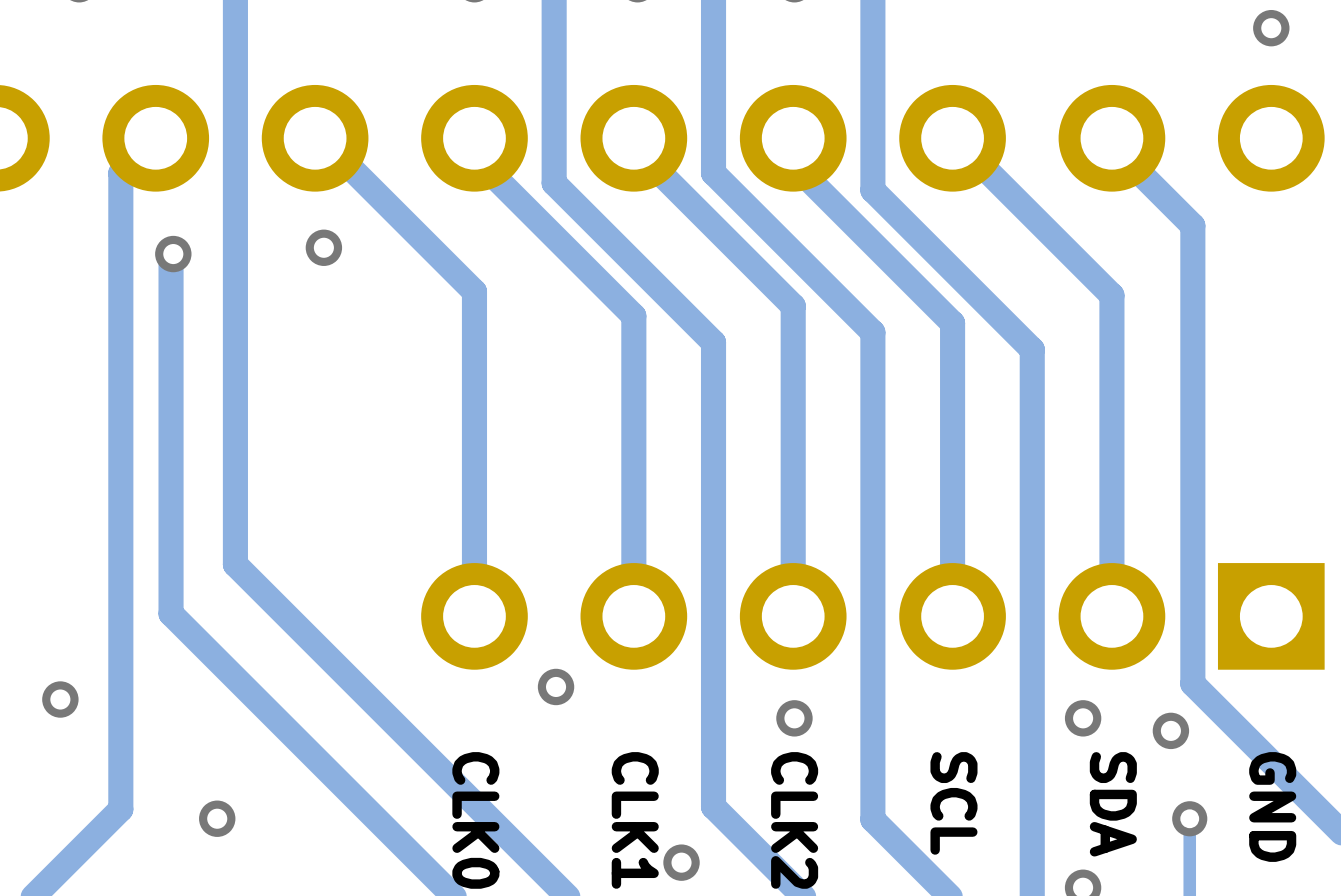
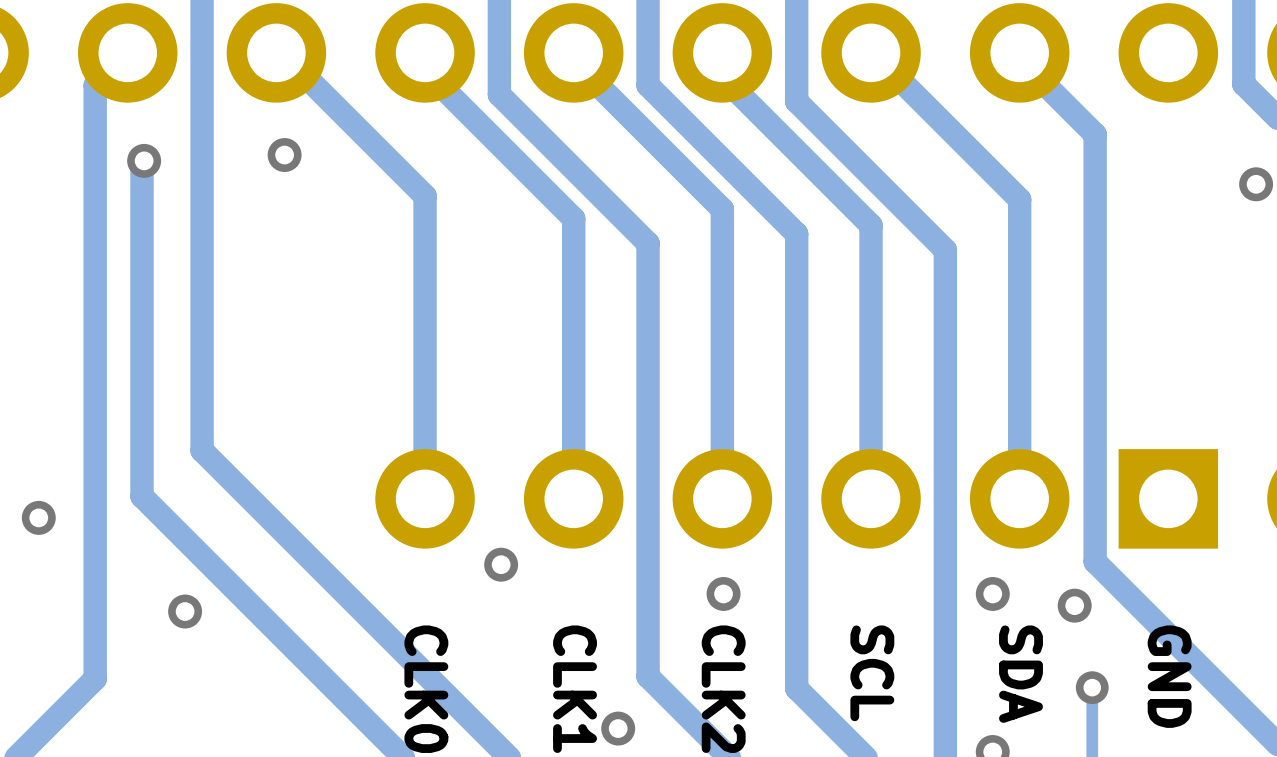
via position: (60, 699) -> (38, 517)
via: none -> (185, 611)
via: (217, 818) -> none

